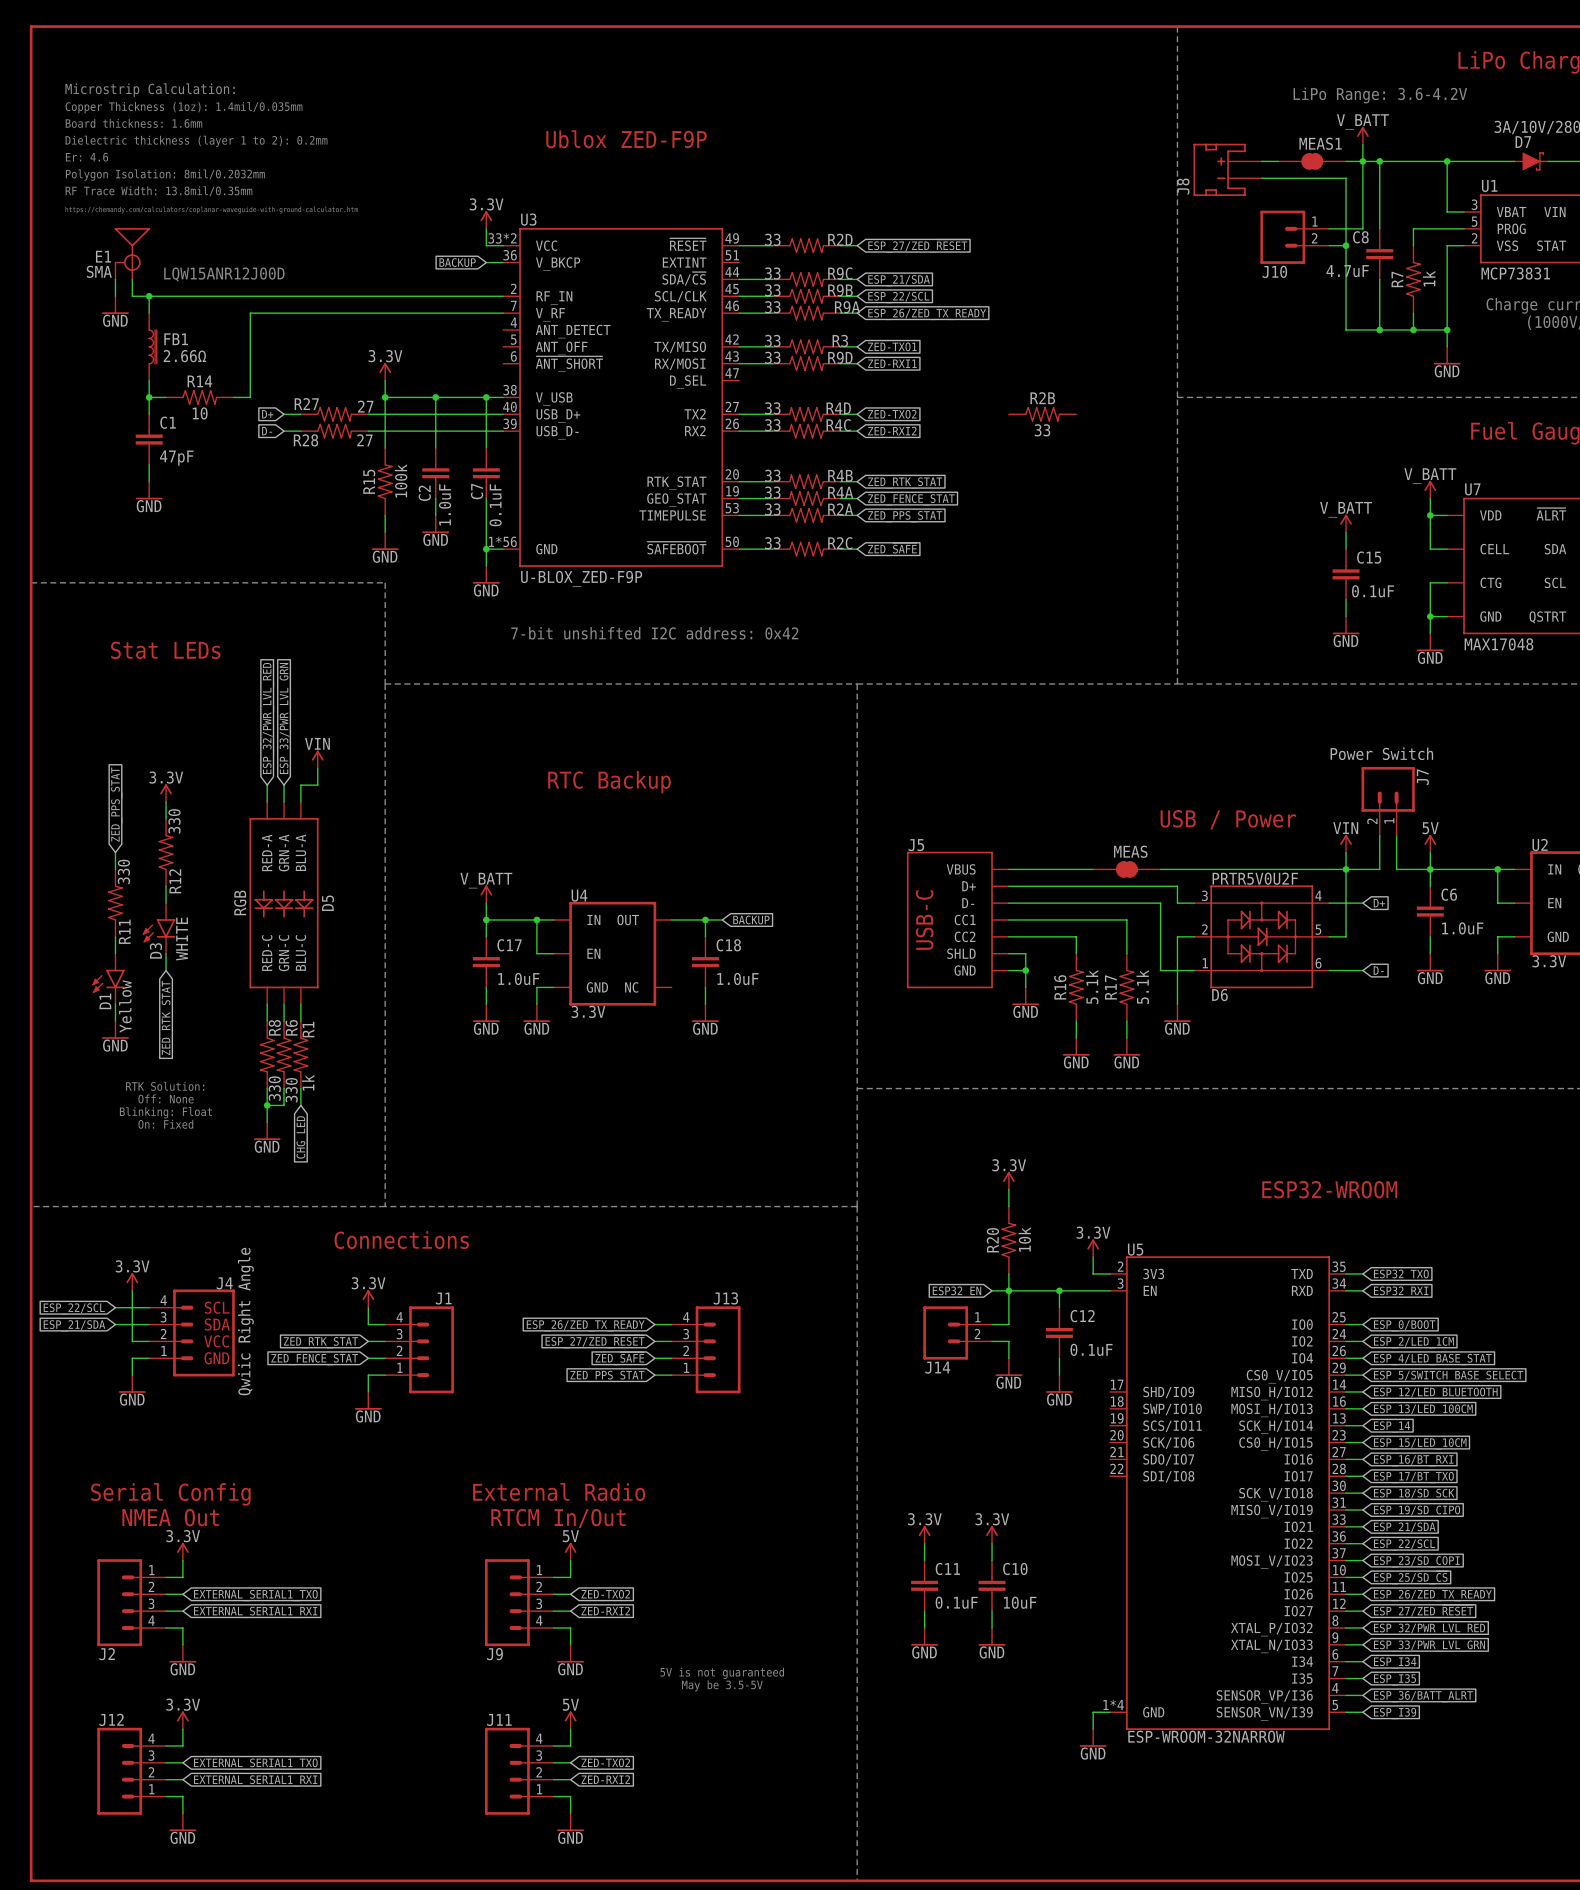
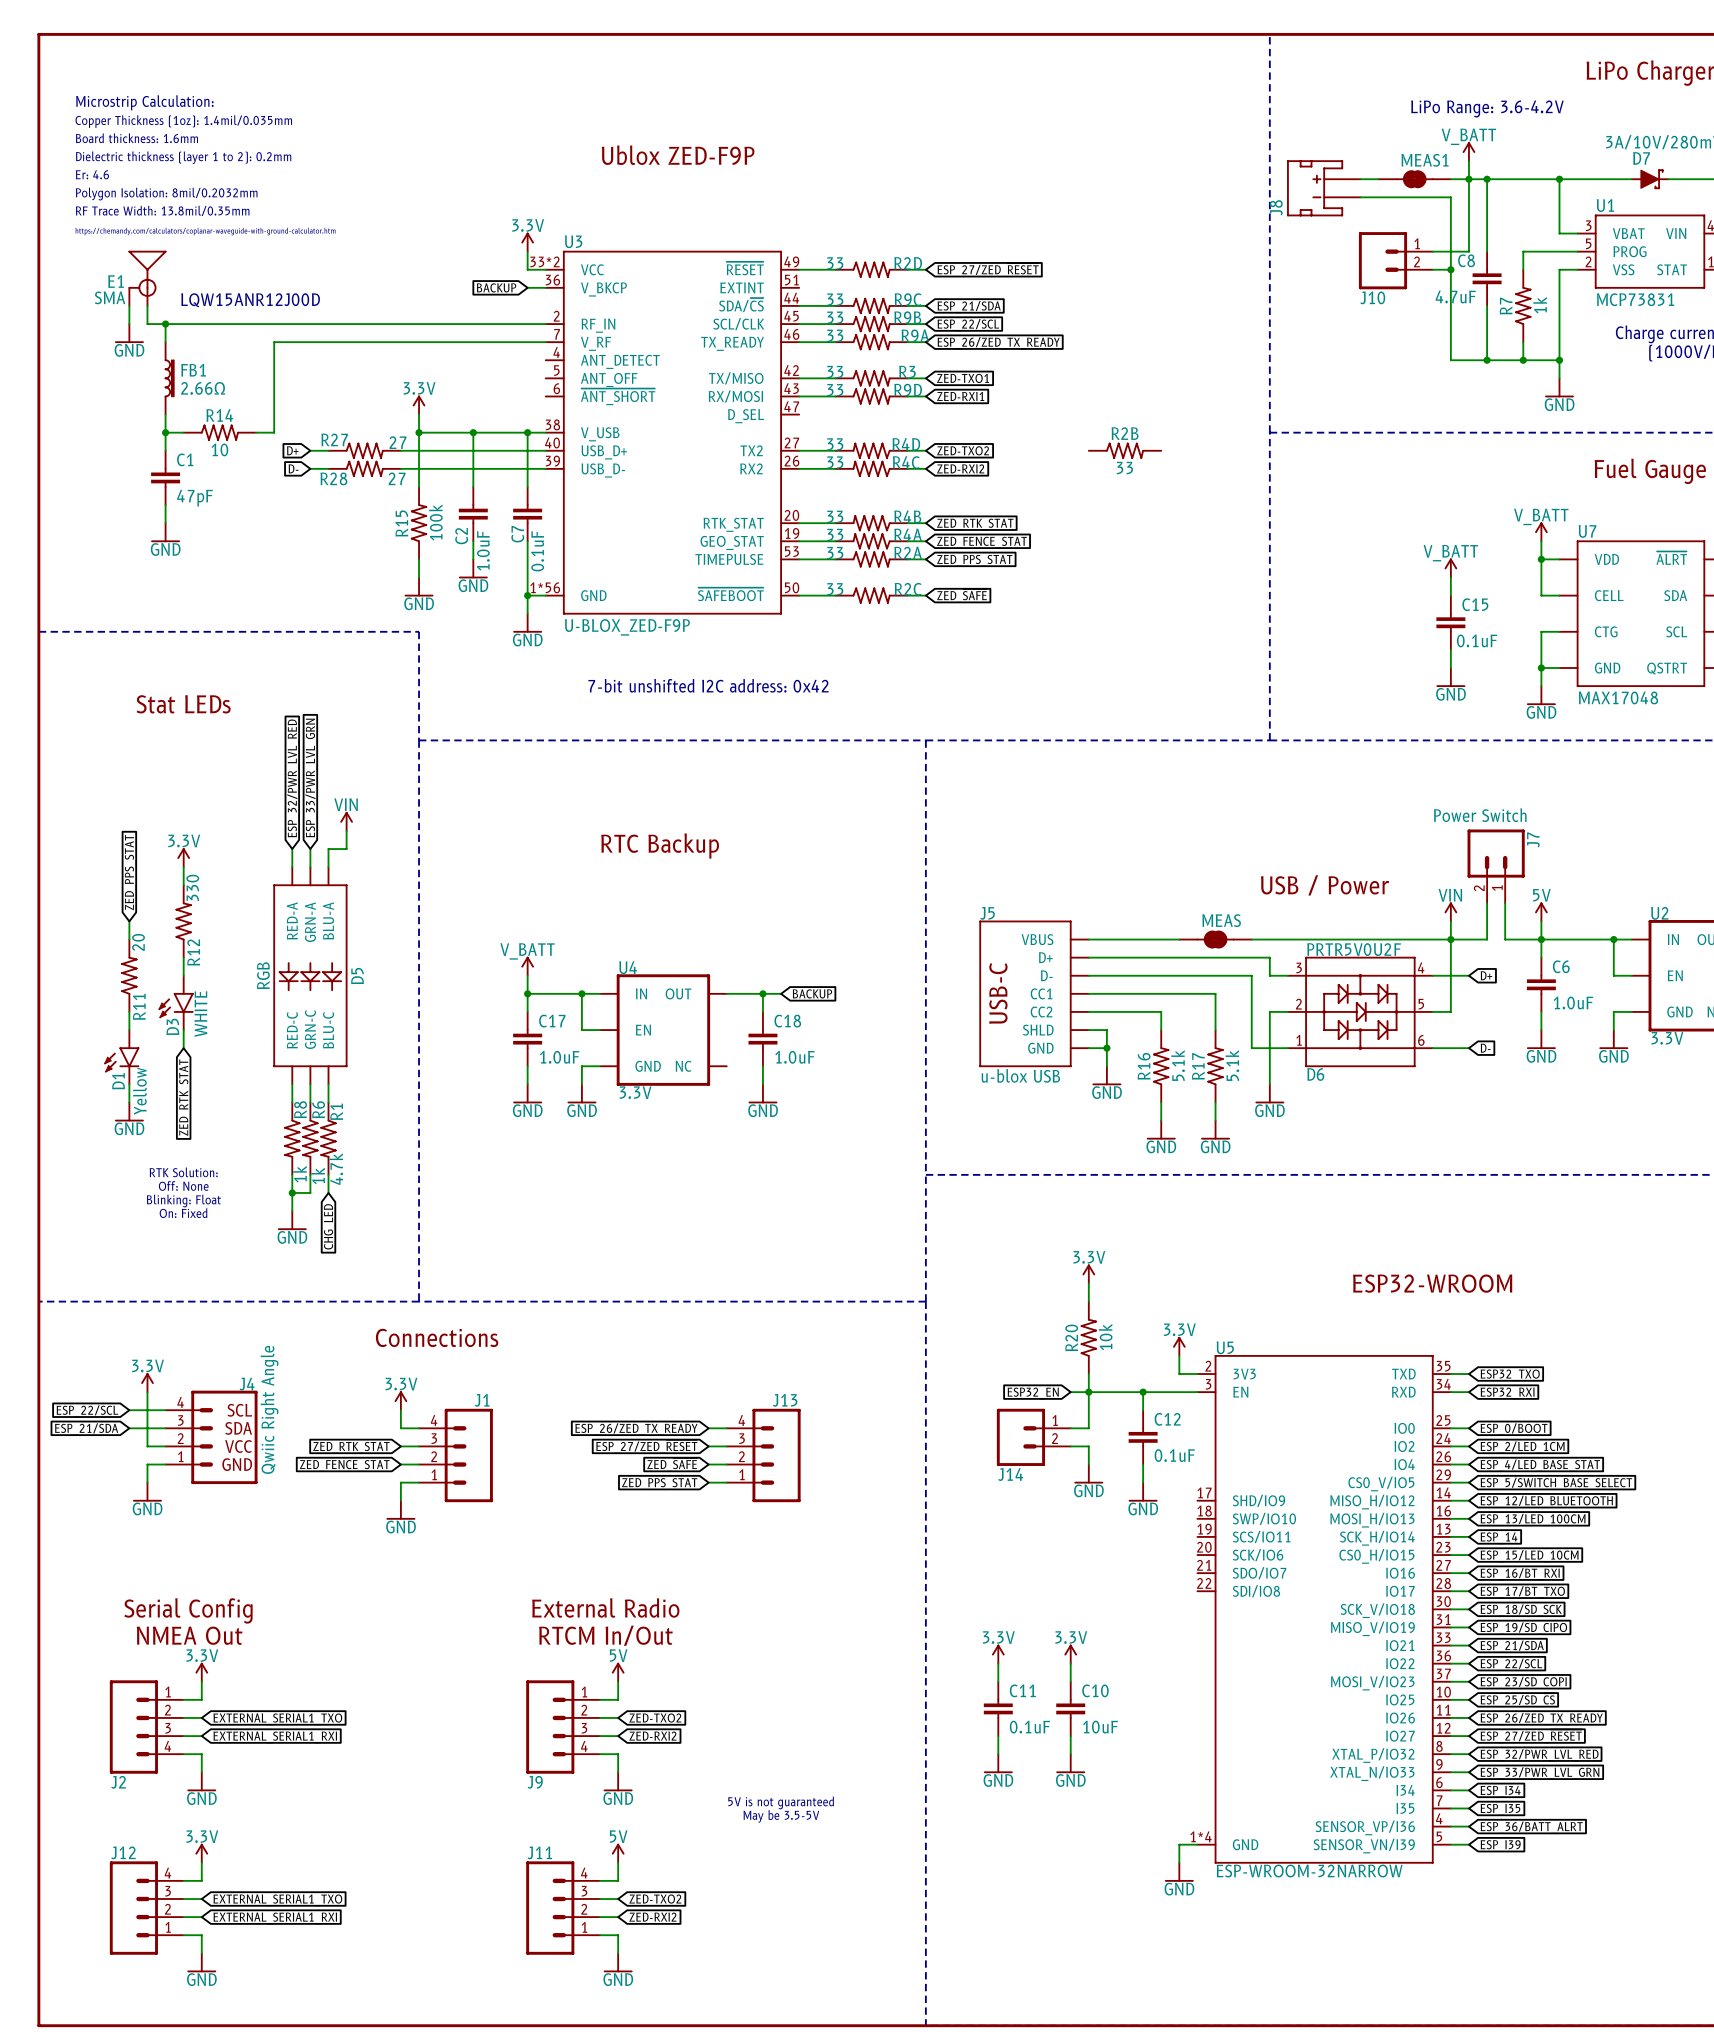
R11 value: 330 (123, 871) -> 20 (138, 942)
J5 value: none -> u-blox USB (1020, 1075)
R1 value: 1k (308, 1082) -> 4.7k (336, 1169)
R8 value: 330 (274, 1088) -> 1k (300, 1174)
R6 value: 330 (291, 1090) -> 1k (318, 1175)

